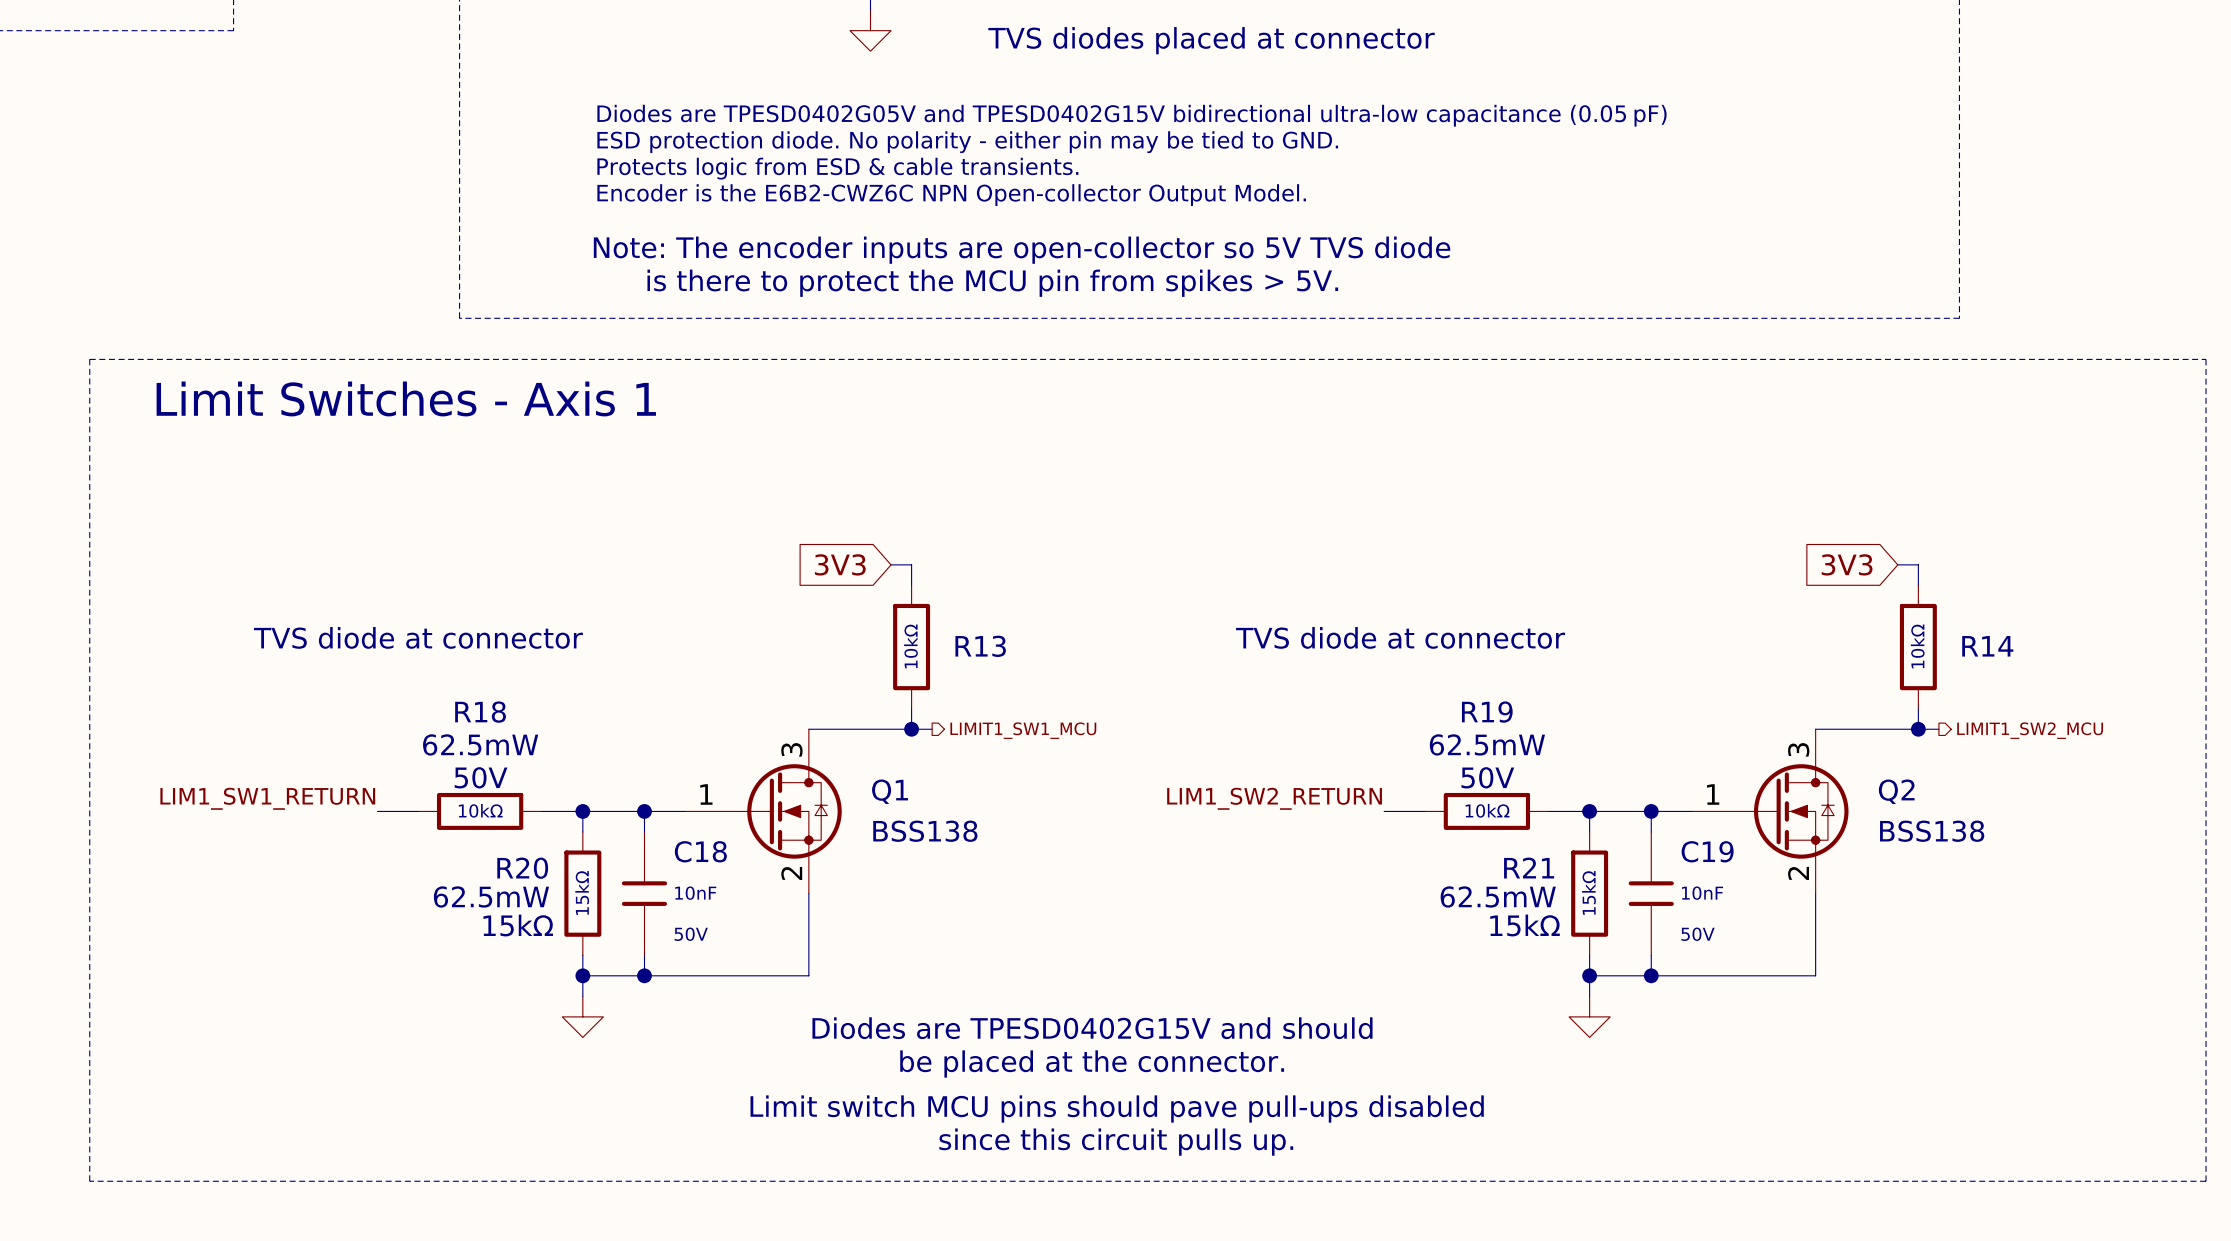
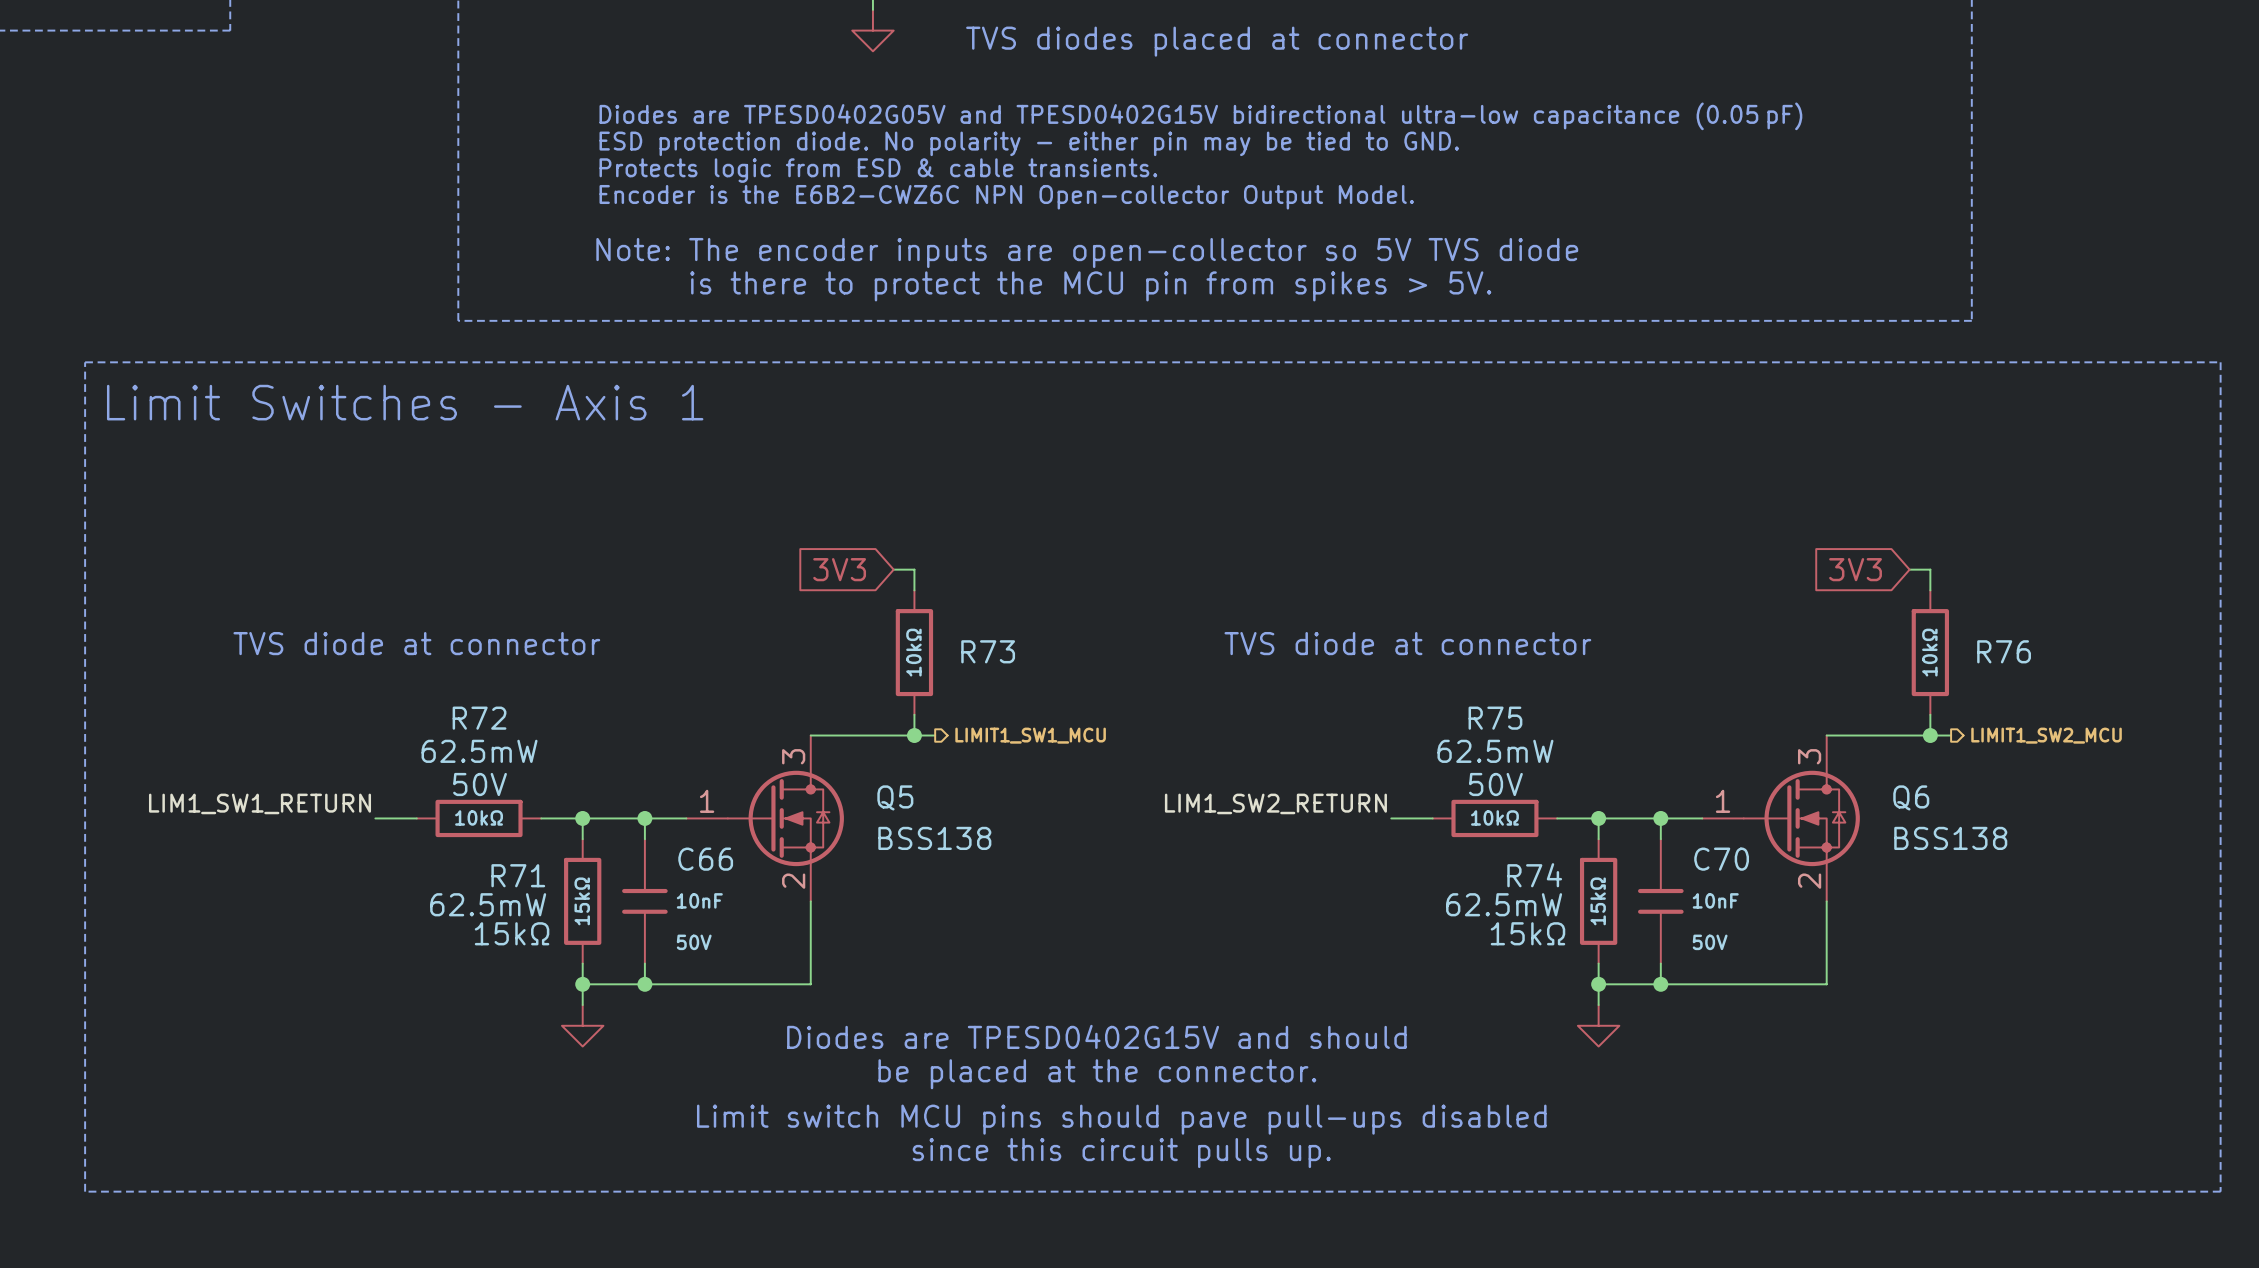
R13 name: R13 (980, 646) -> R73 (988, 651)
R14 name: R14 (1987, 646) -> R76 (2004, 651)
R18 name: R18 (480, 712) -> R72 (479, 718)
R19 name: R19 (1487, 712) -> R75 (1495, 718)
Q1 name: Q1 (890, 791) -> Q5 (895, 797)
Q2 name: Q2 (1896, 791) -> Q6 (1911, 797)
C18 name: C18 (700, 851) -> C66 (705, 859)
C19 name: C19 (1707, 851) -> C70 (1721, 859)
R20 name: R20 (522, 868) -> R71 (518, 875)
R21 name: R21 (1529, 868) -> R74 (1534, 875)

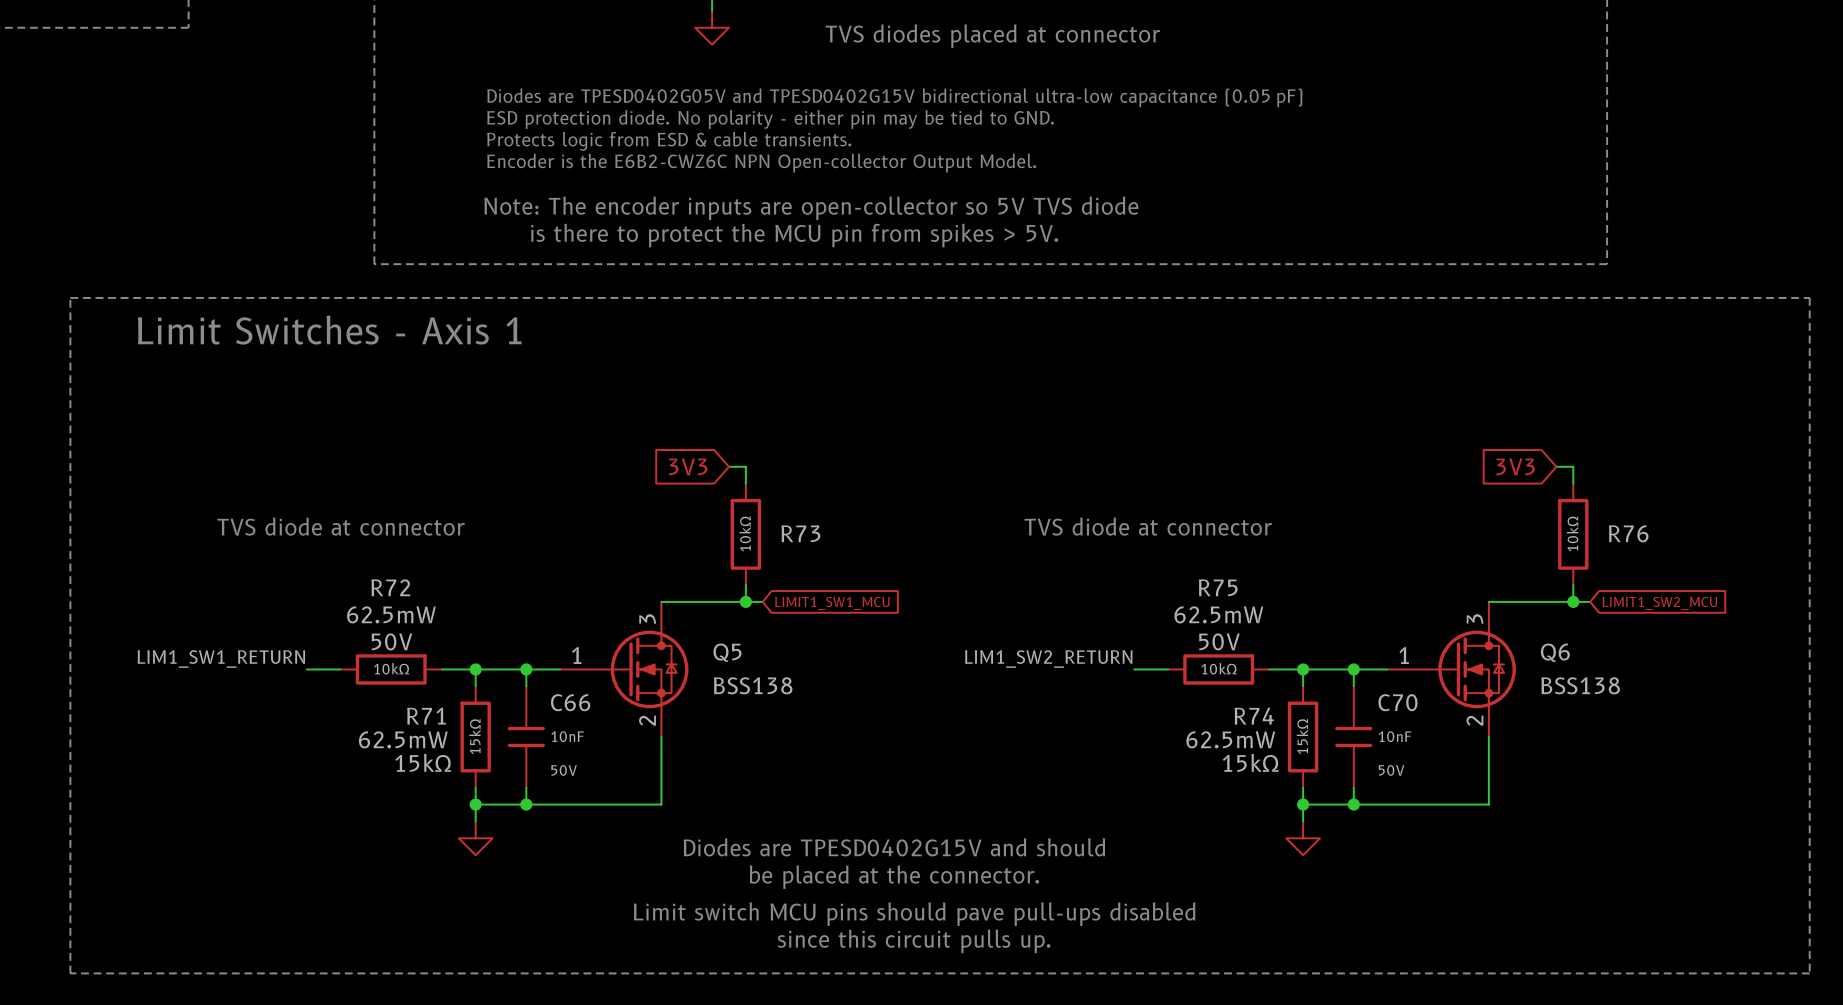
hierarchical label: LIMIT1_SW1_MCU (1030, 735) -> none
hierarchical label: LIMIT1_SW2_MCU (2046, 735) -> none
global label: none -> LIMIT1_SW1_MCU (832, 603)
global label: none -> LIMIT1_SW2_MCU (1659, 603)

